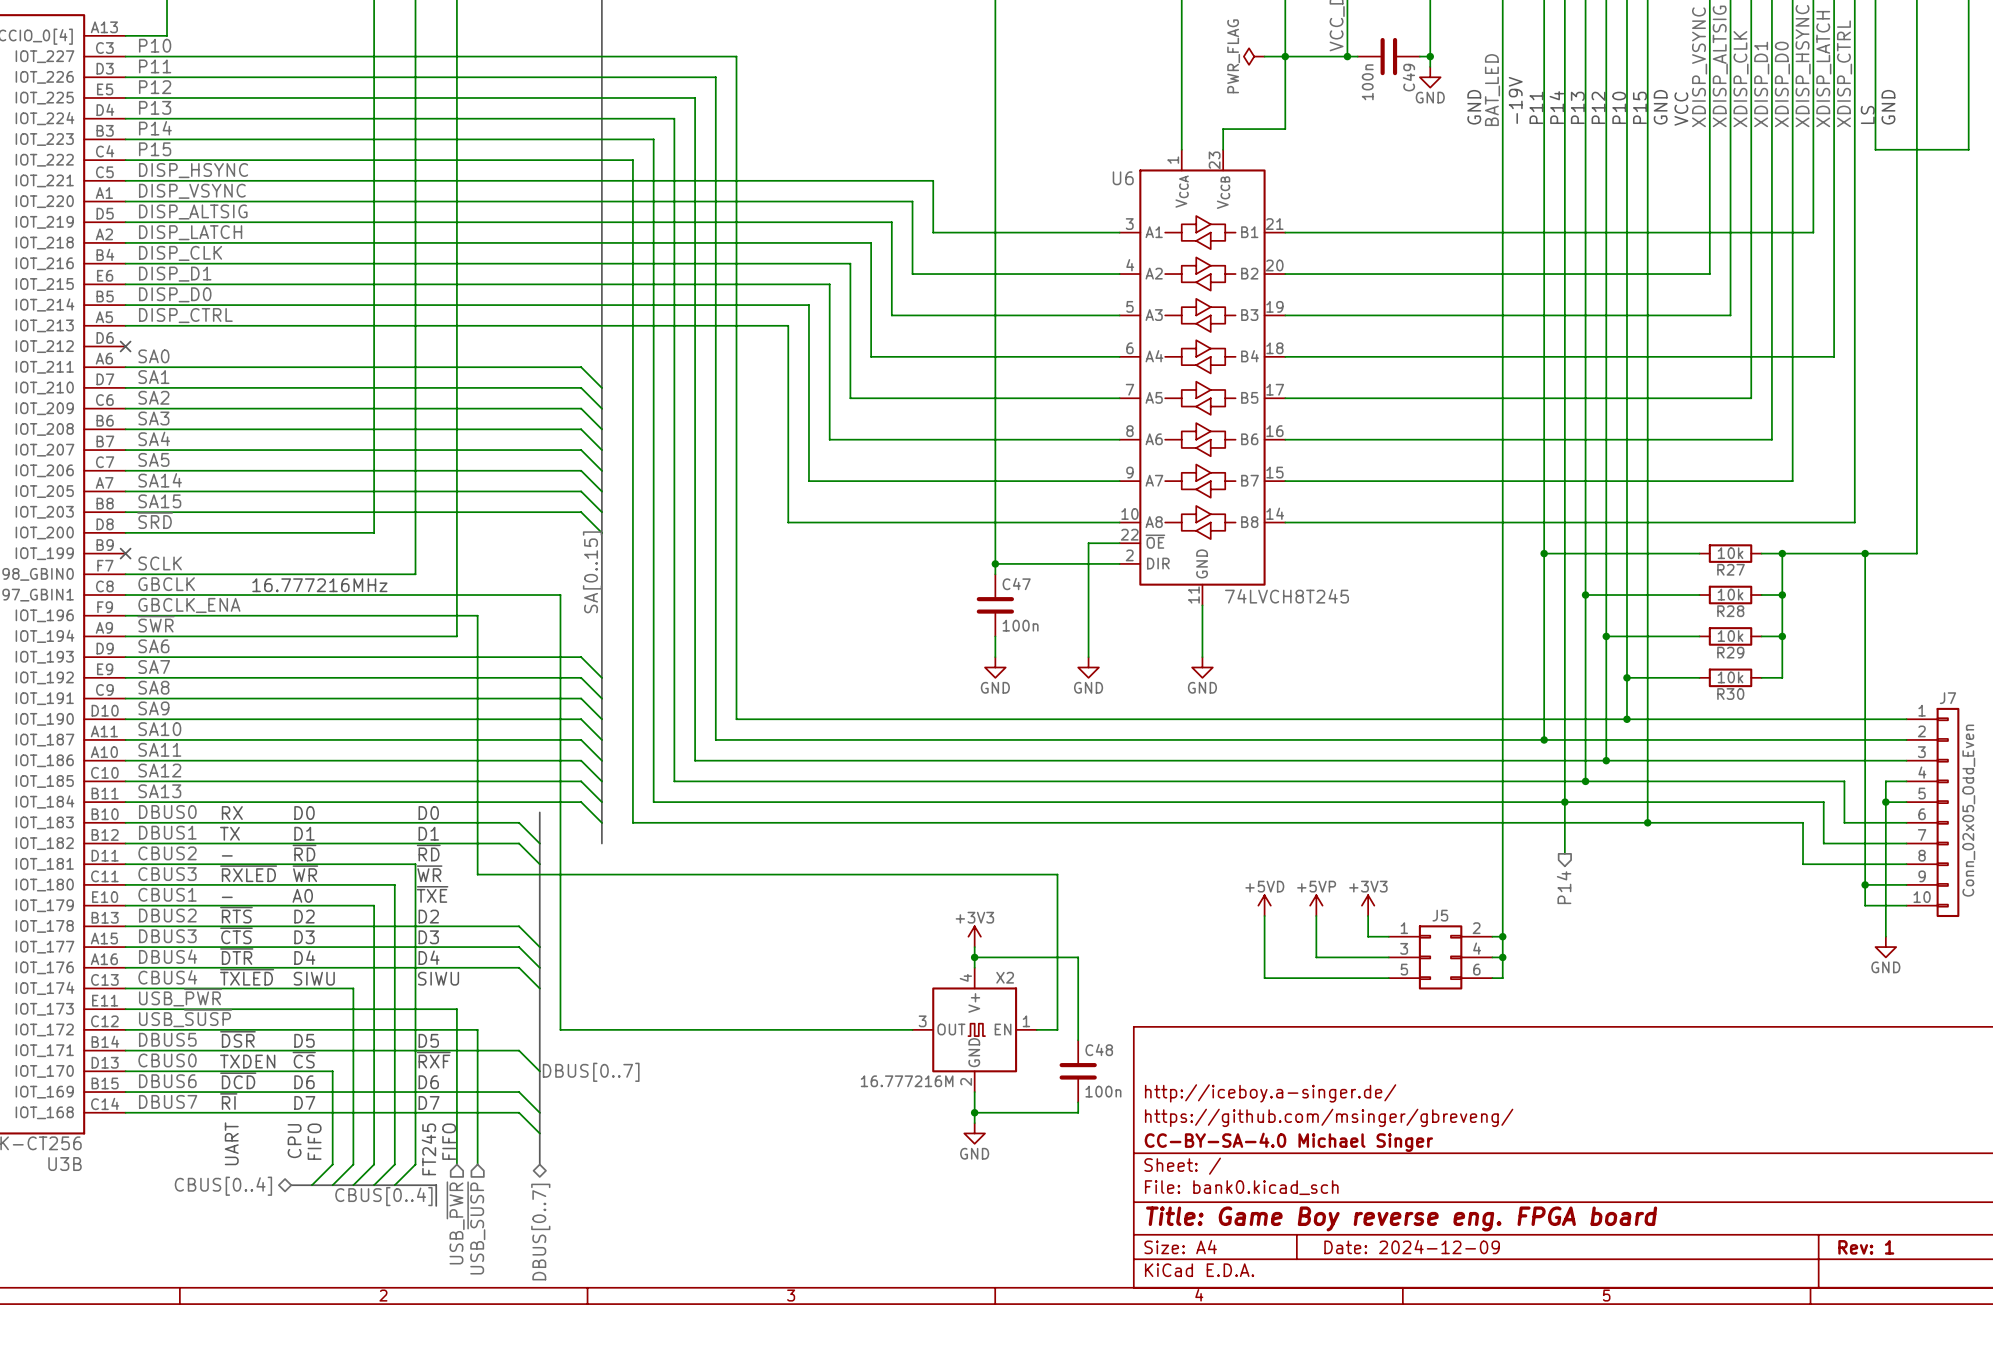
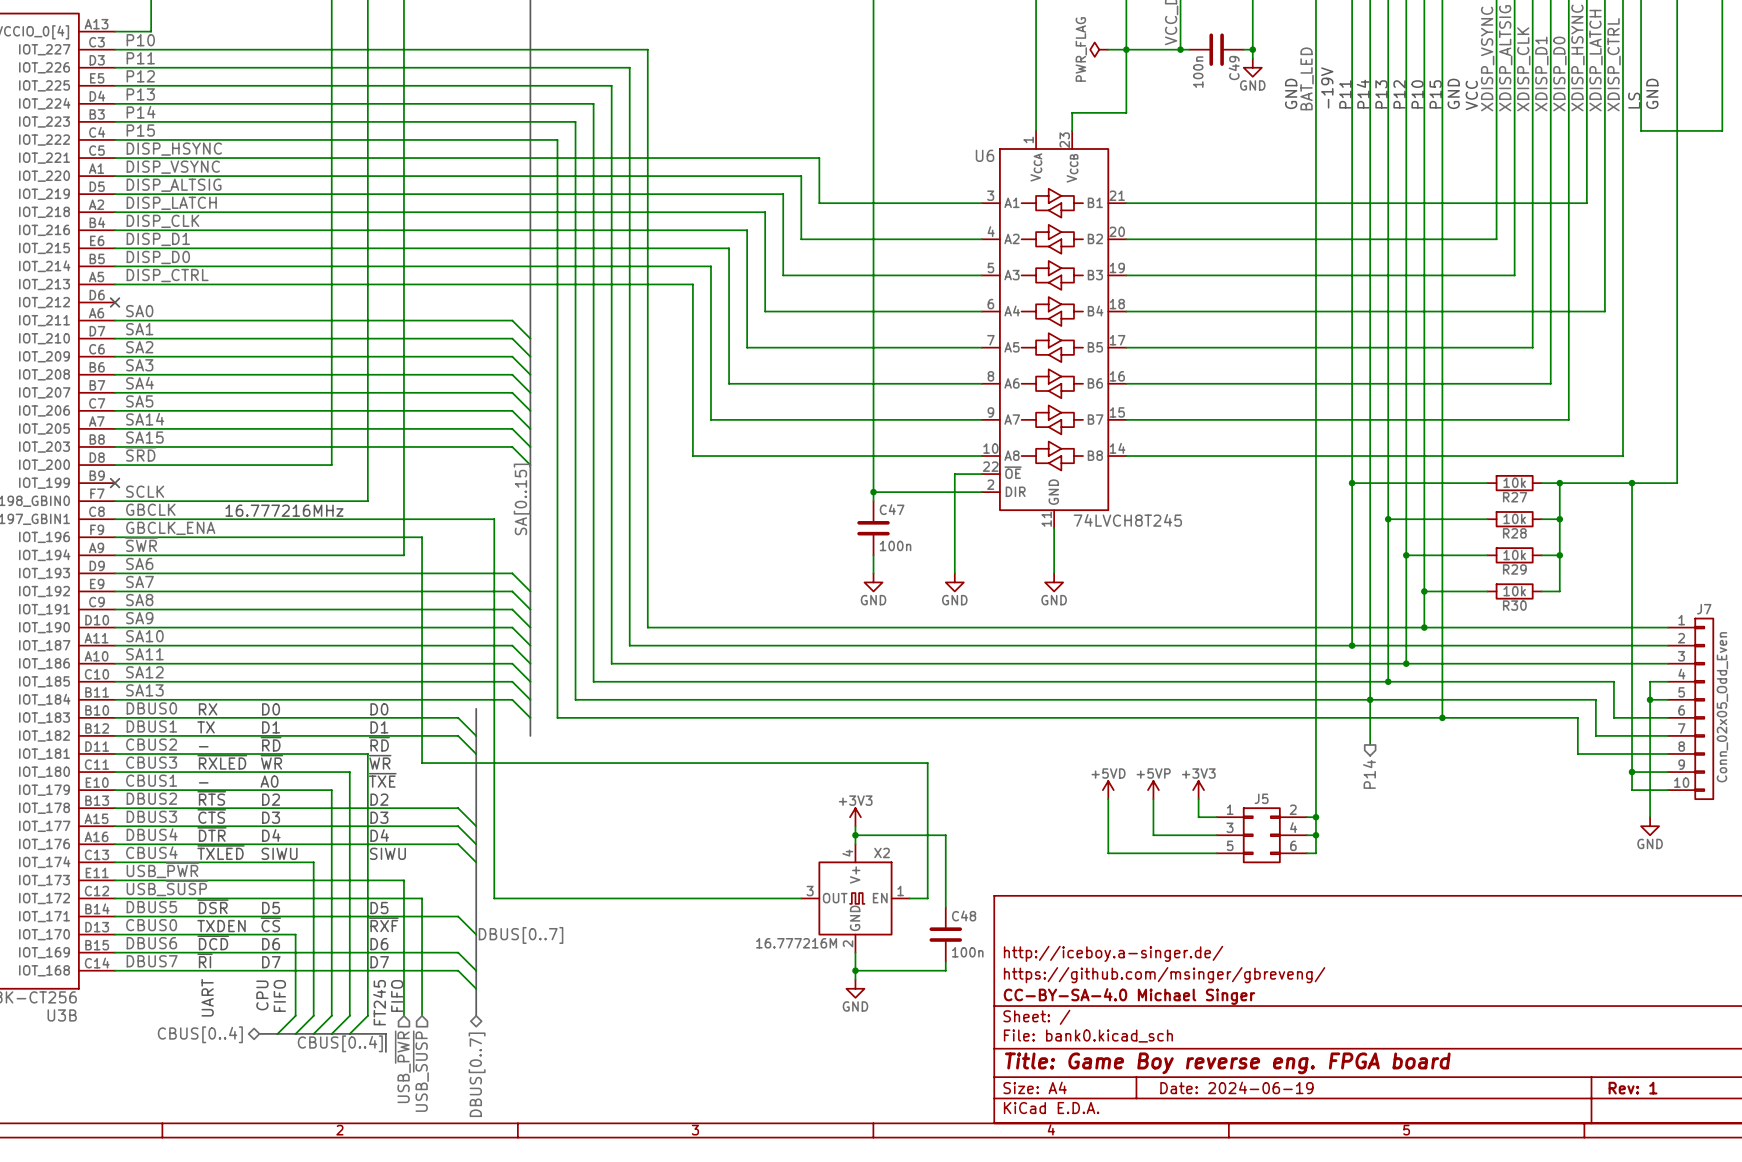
title block: Date: 2024-12-09 (1412, 1247) -> Date: 2024-06-19 (1236, 1087)

